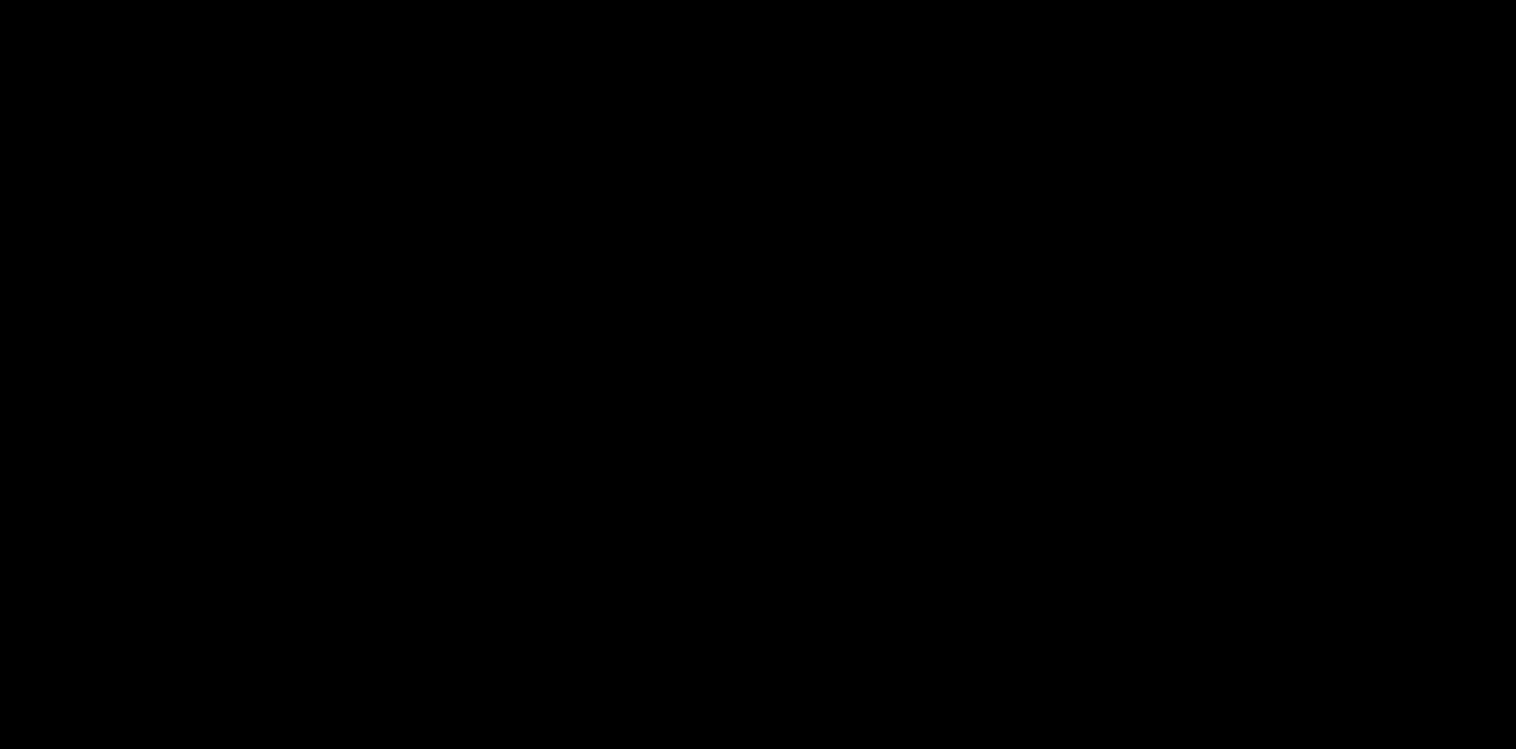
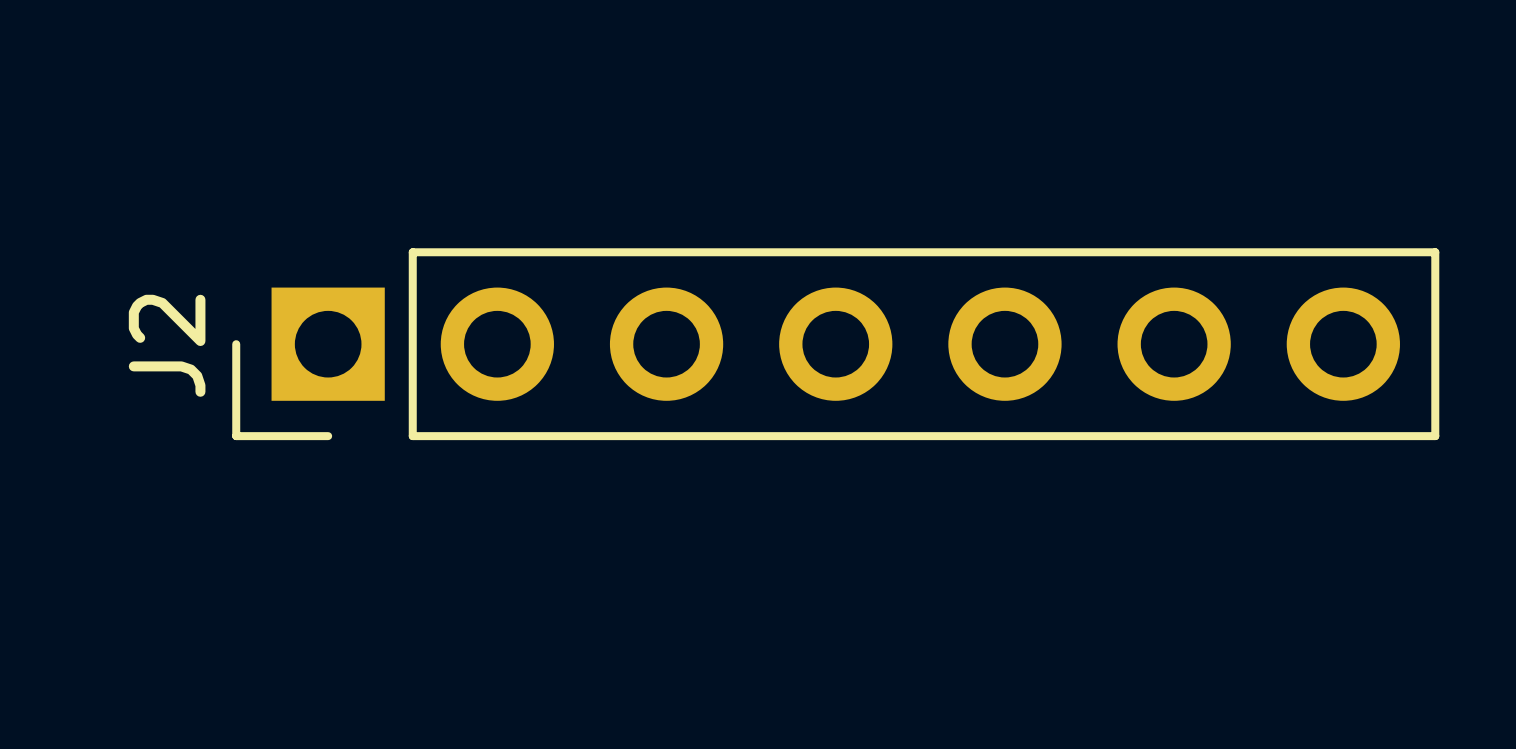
J2: none -> (835, 344)

